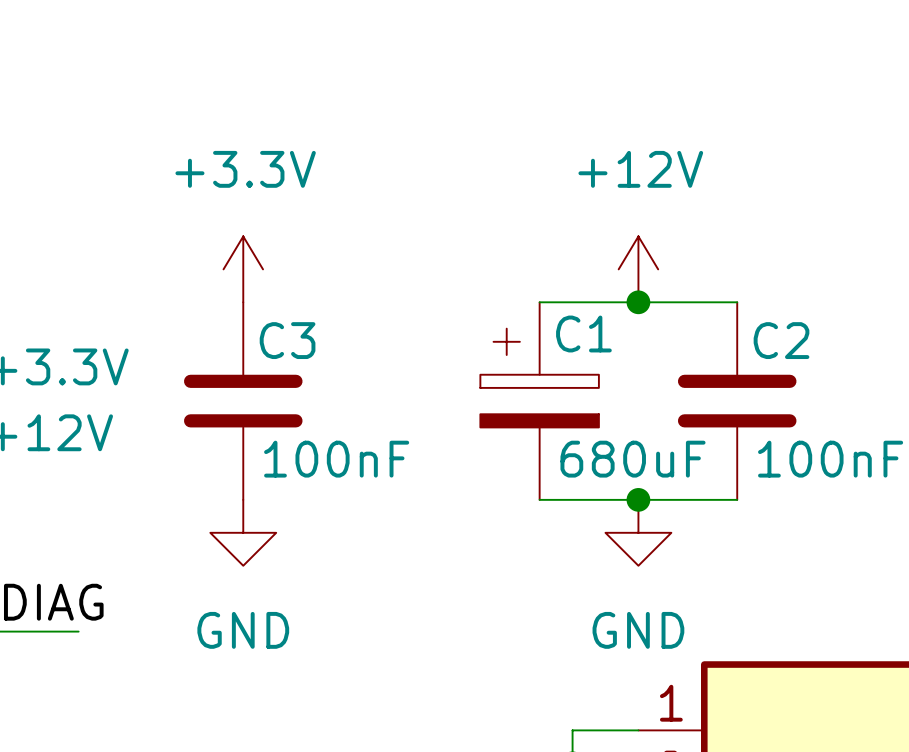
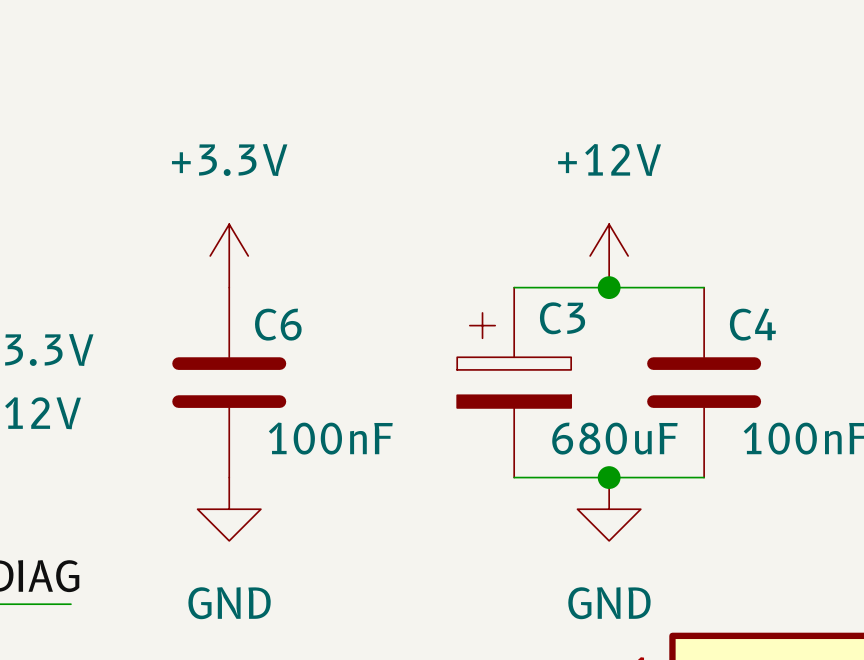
C1 name: C1 (583, 334) -> C3 (562, 318)
C3 name: C3 (287, 340) -> C6 (278, 324)
C2 name: C2 (781, 340) -> C4 (752, 324)

